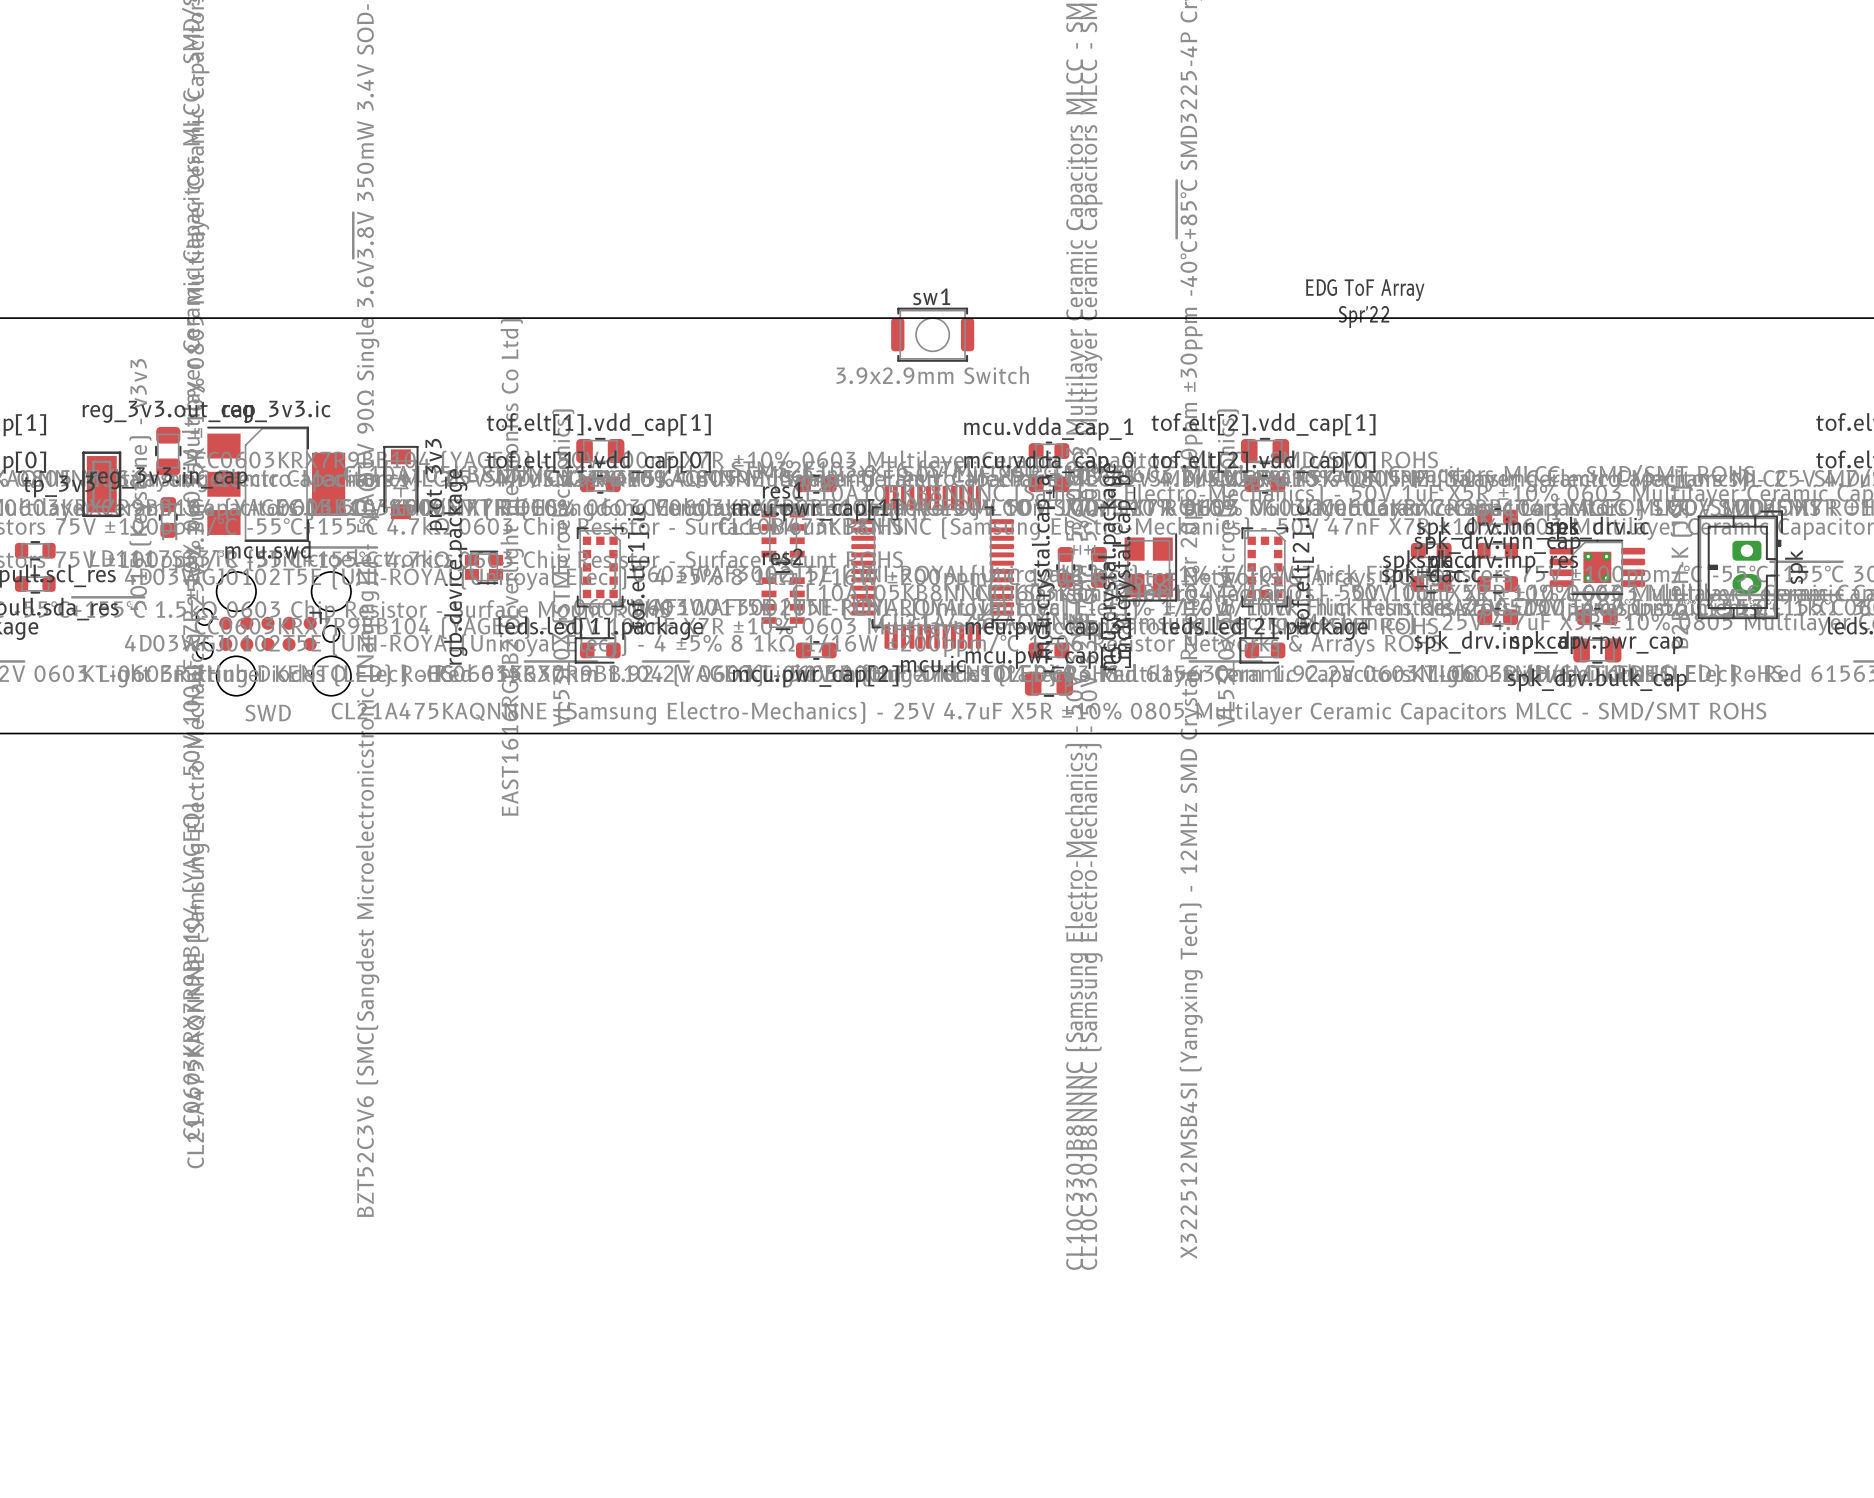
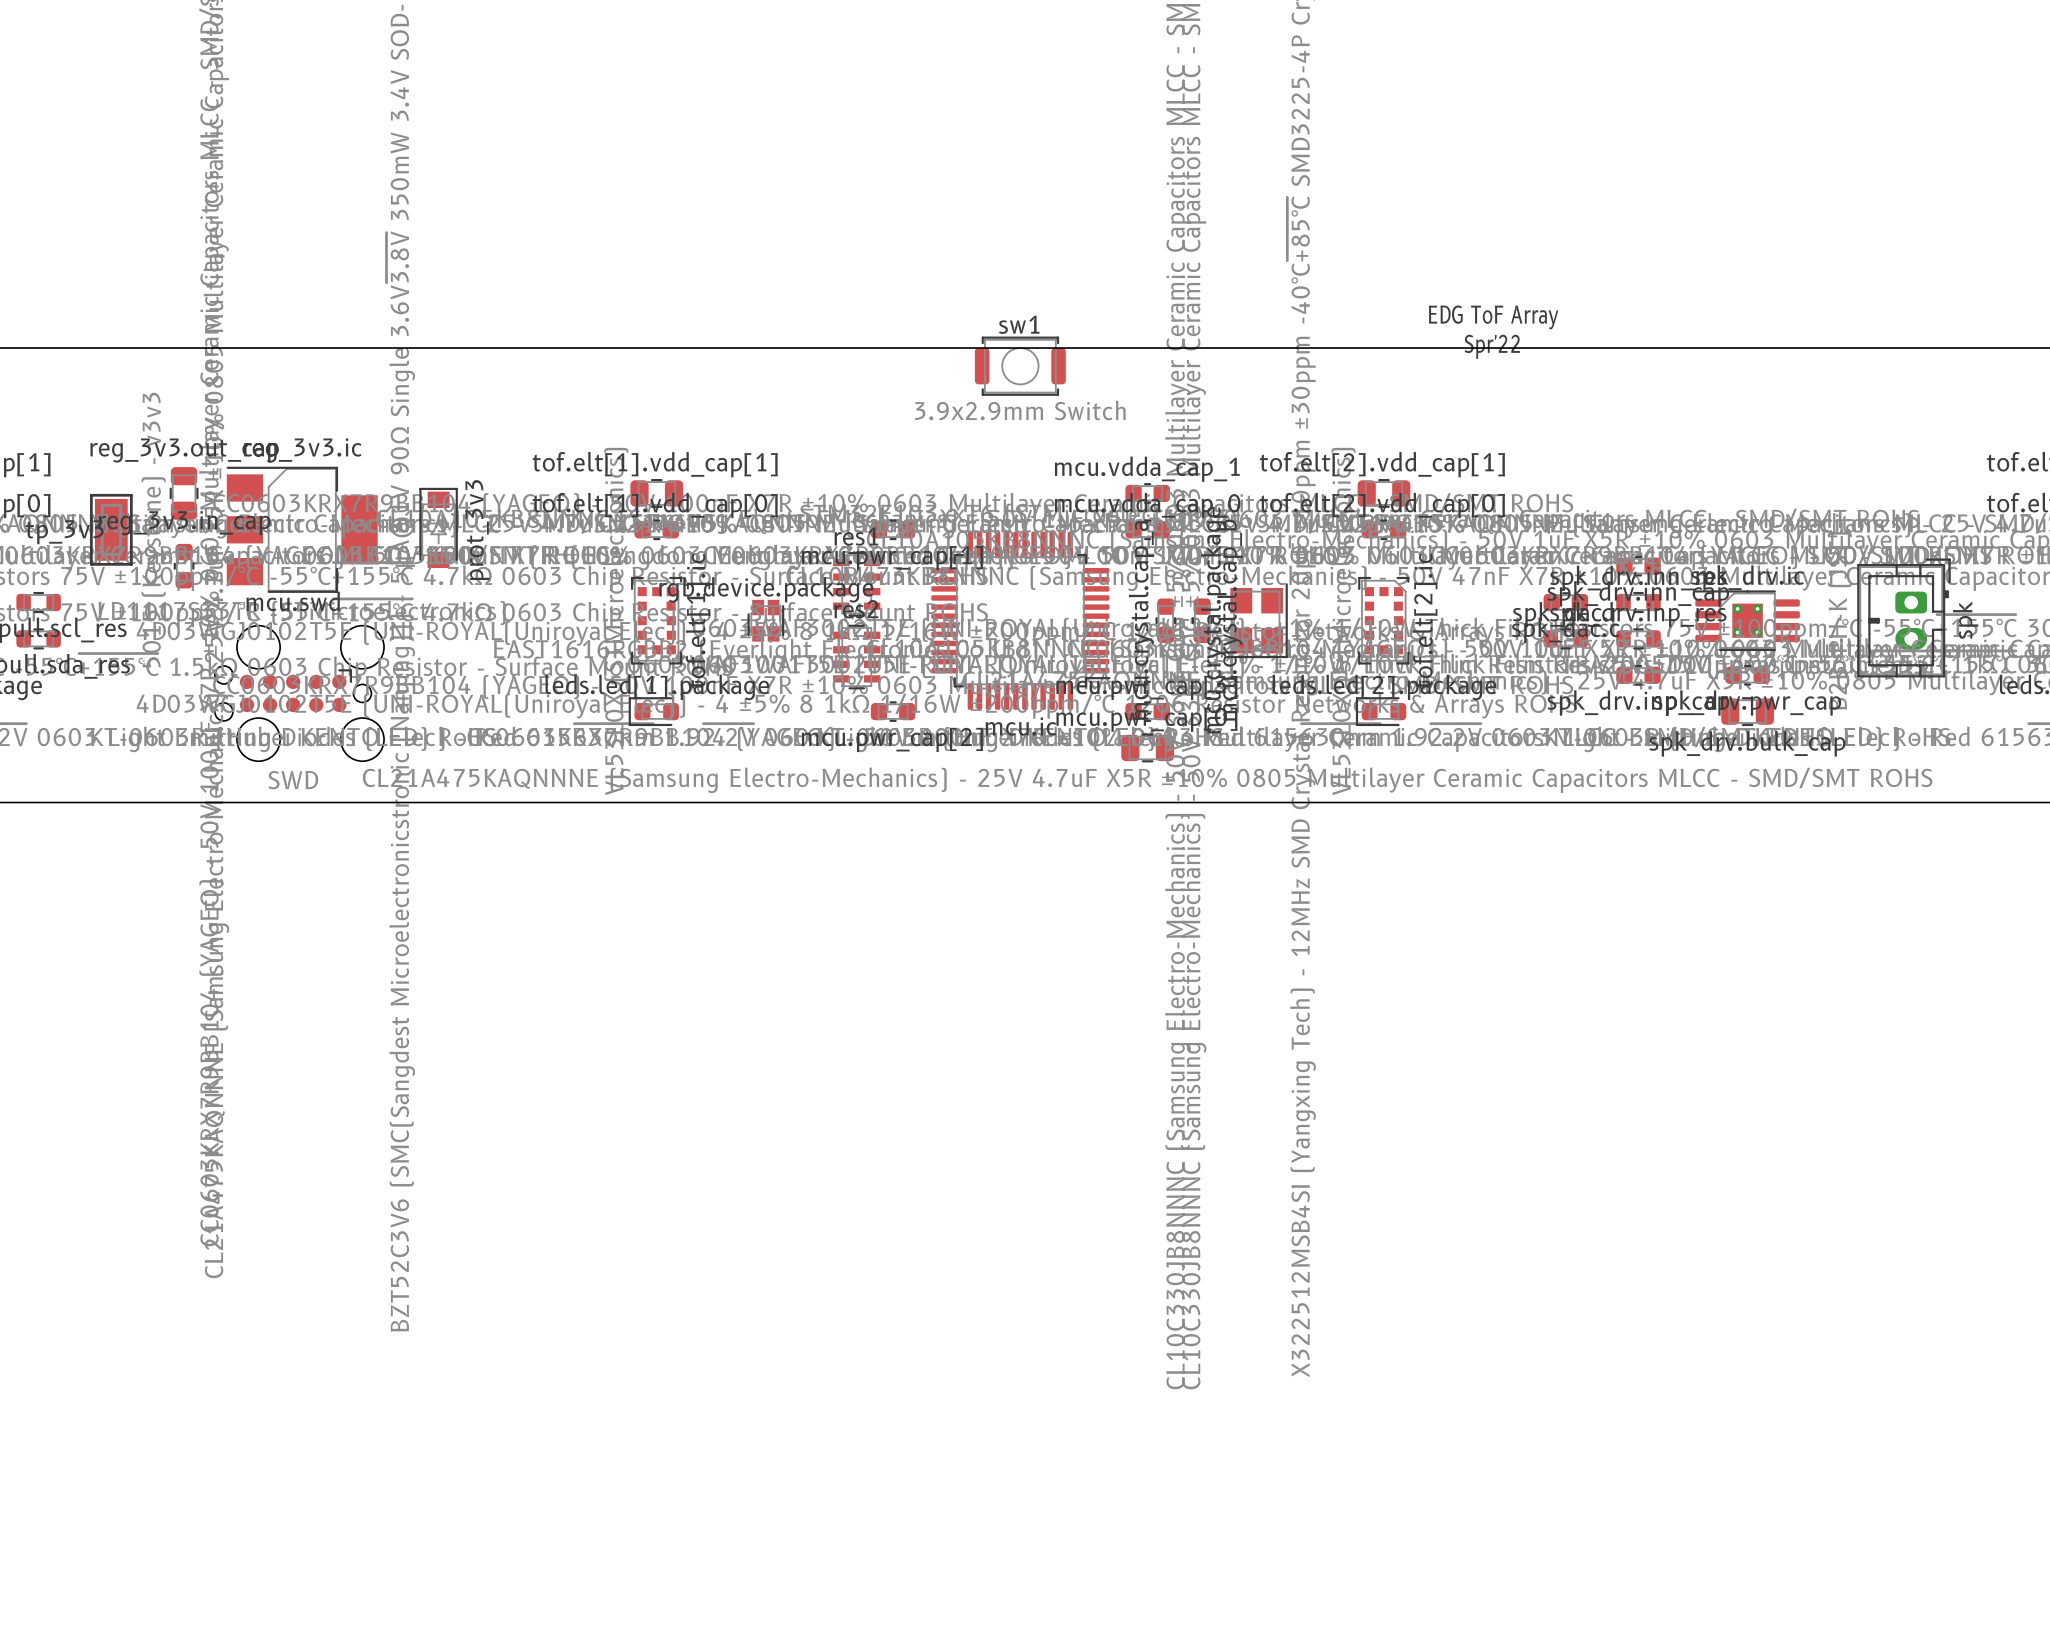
rgb.device.package rotation: 0° (484, 567) -> 90° clockwise (765, 620)
rgb.device.package position: (484, 567) -> (765, 620)

